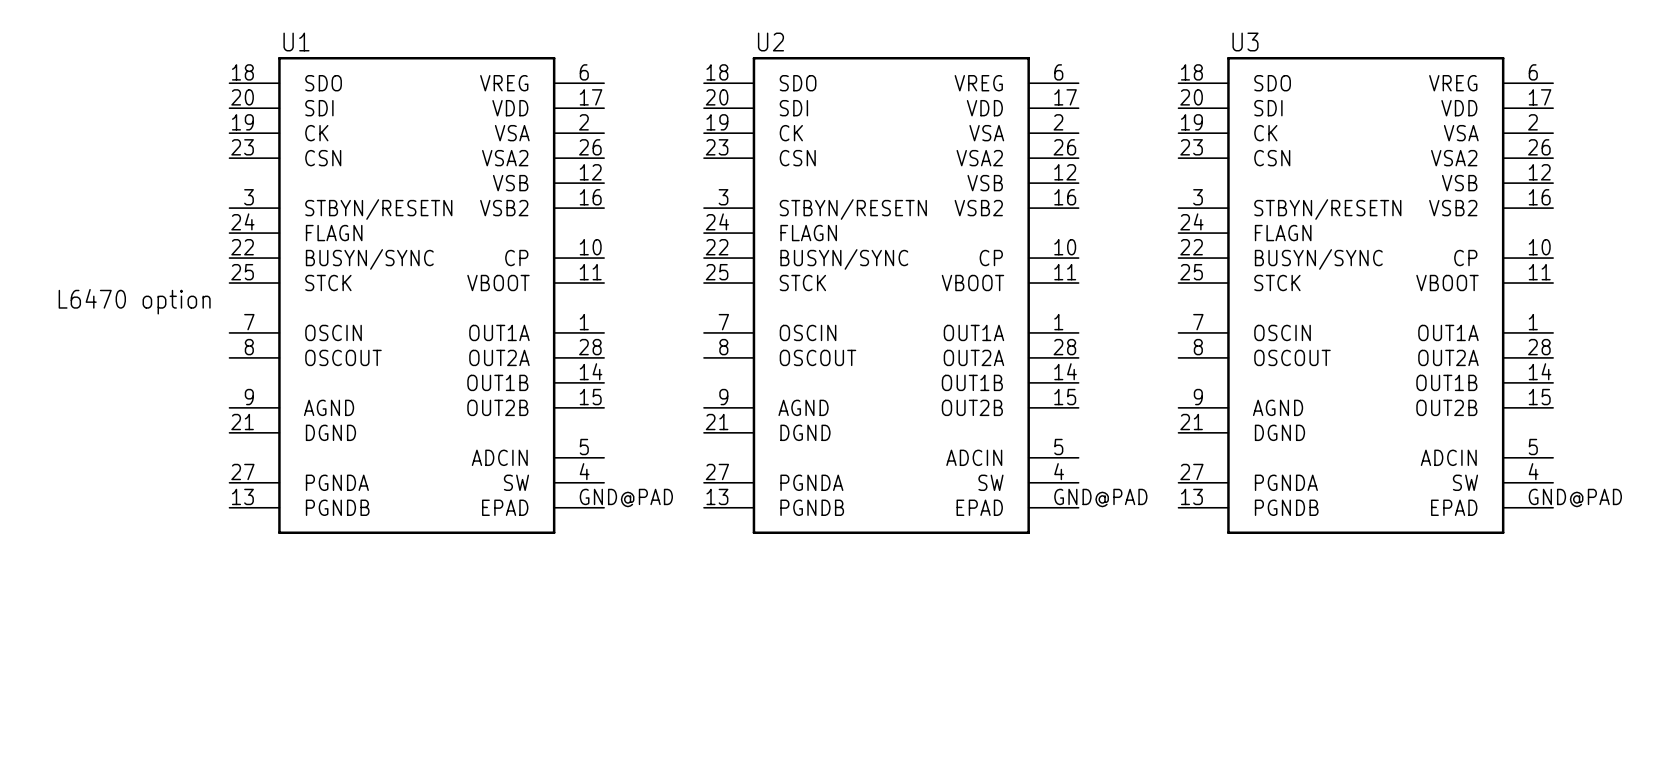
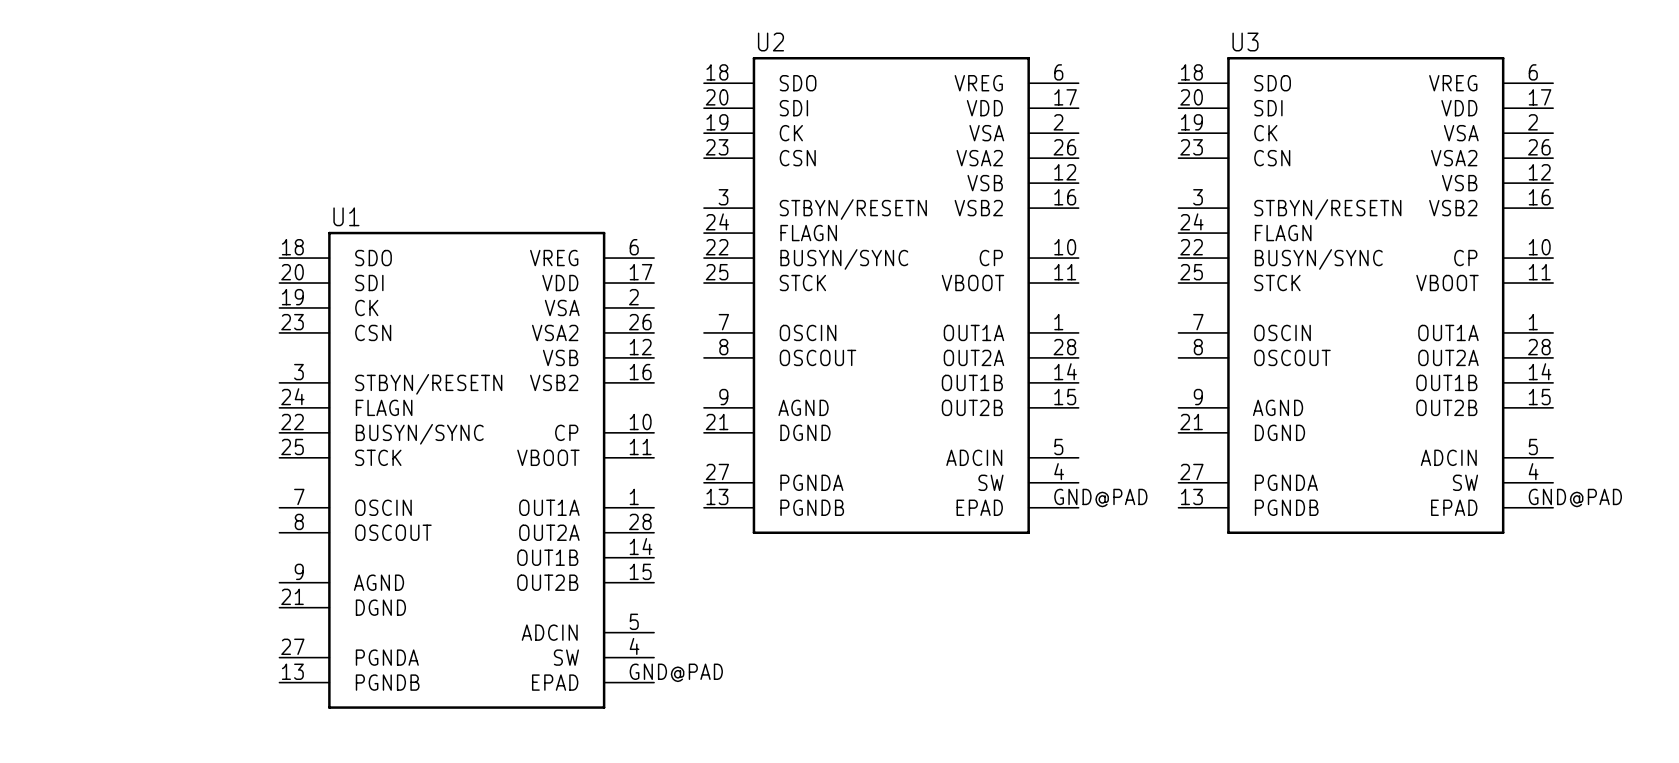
U1 position: (416, 295) -> (466, 470)
text: L6470 option (134, 301) -> none

